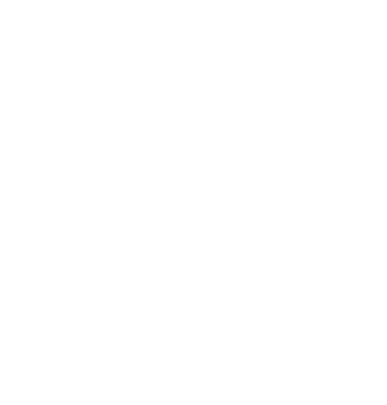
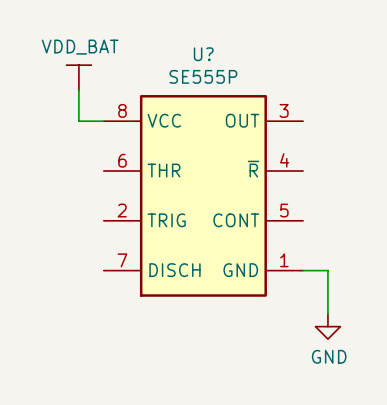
power symbol: none -> VDD_BAT (78, 77)
wire: none -> (78, 90) (78, 121) (103, 121)
U?: none -> SE555P (203, 195)
wire: none -> (303, 270) (327, 270) (327, 314)
power symbol: none -> GND (327, 326)

